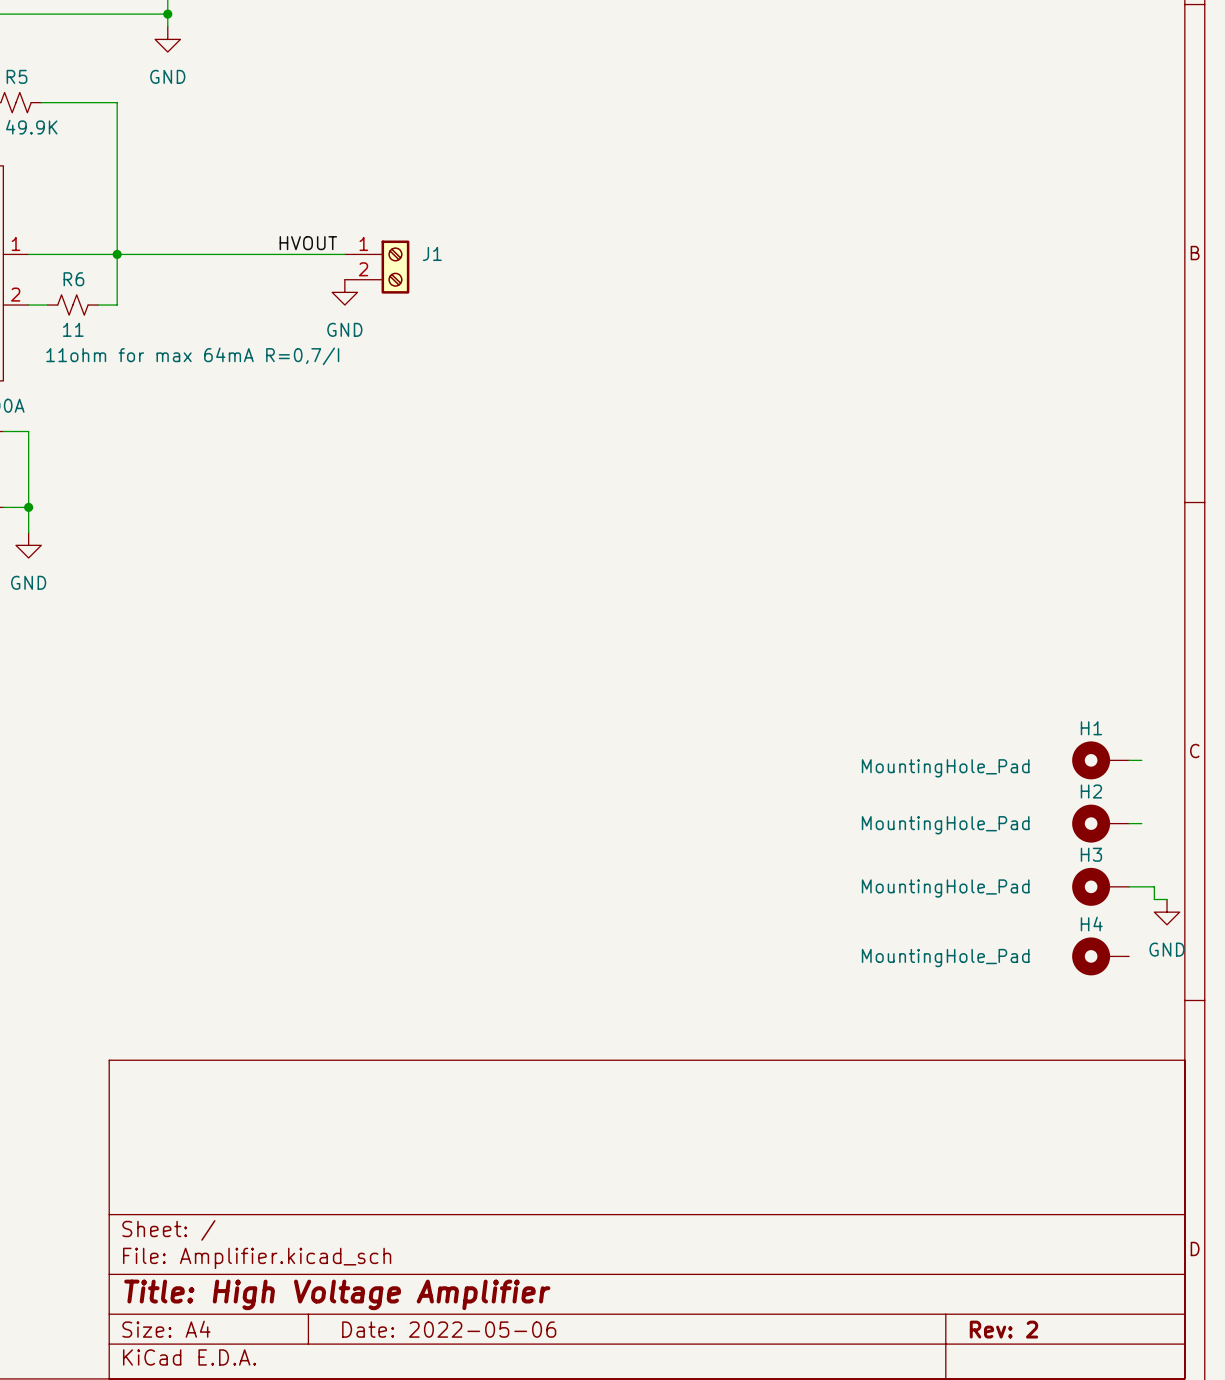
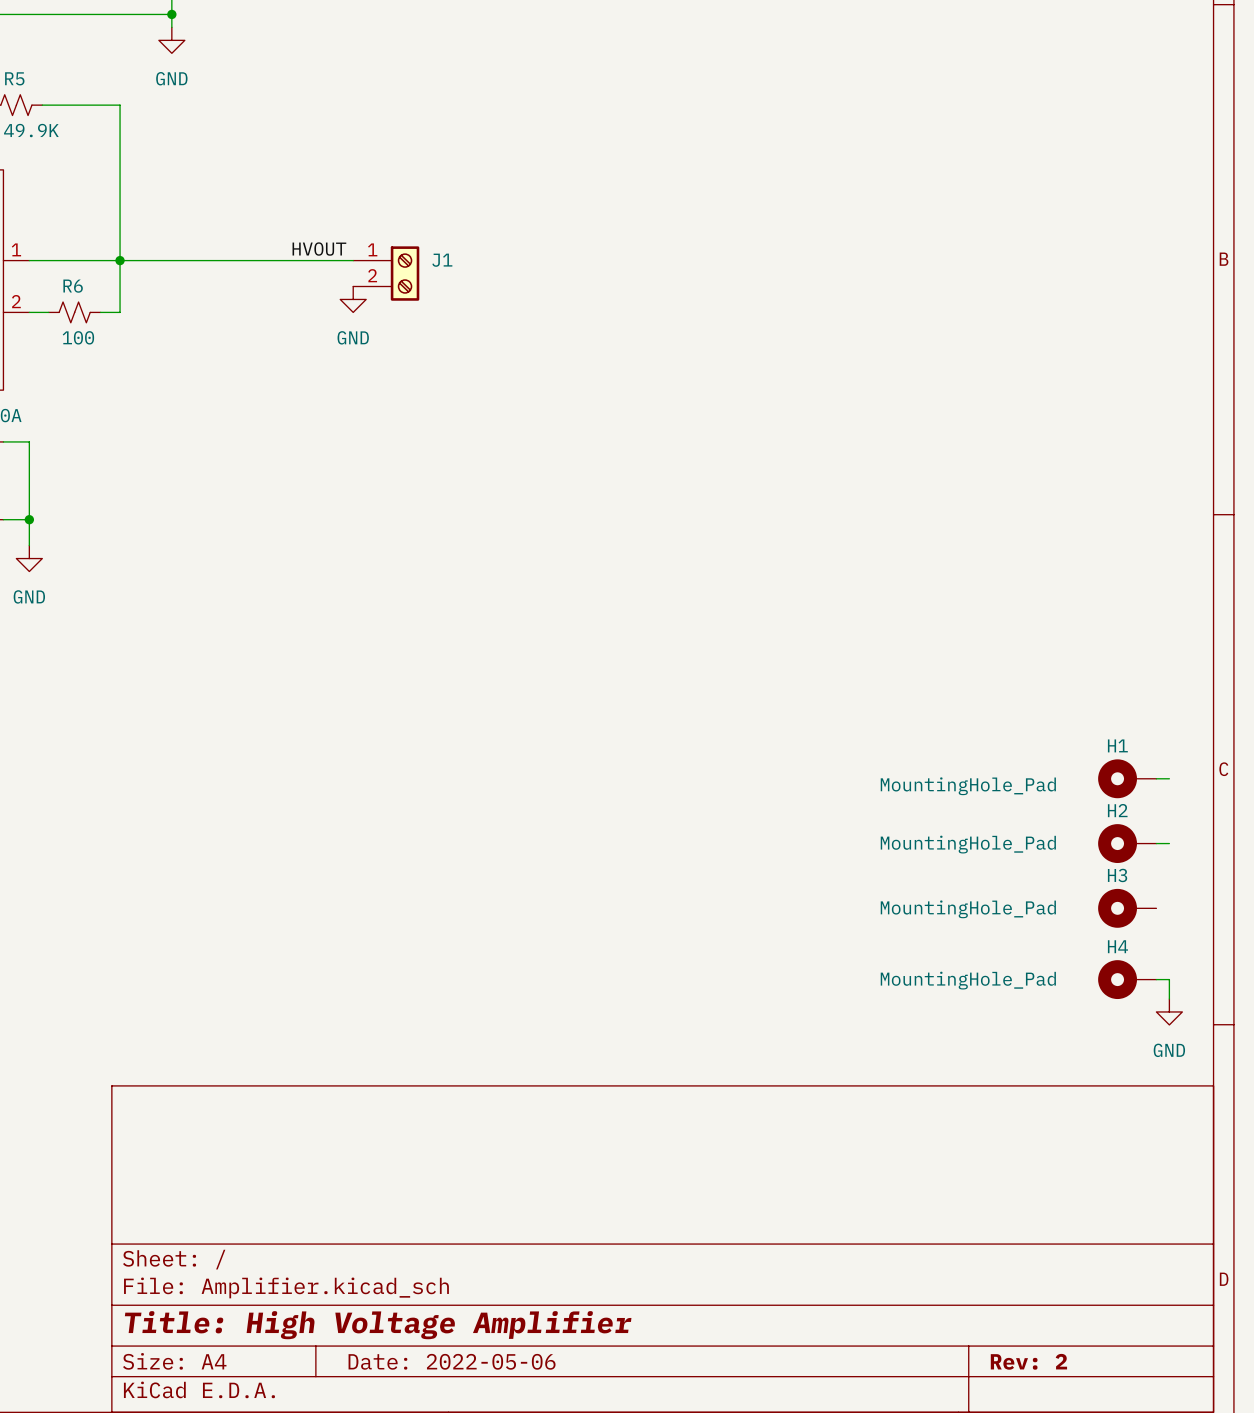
R6 value: 11 (73, 329) -> 100 (78, 337)
R6 text: 11ohm for max 64mA R=0,7/I (192, 356) -> none
wire: (1129, 886) (1154, 886) (1154, 899) (1167, 899) -> none
power symbol position: GND (1167, 912) -> GND (1169, 1011)
wire: none -> (1156, 979) (1169, 979) (1169, 999)

